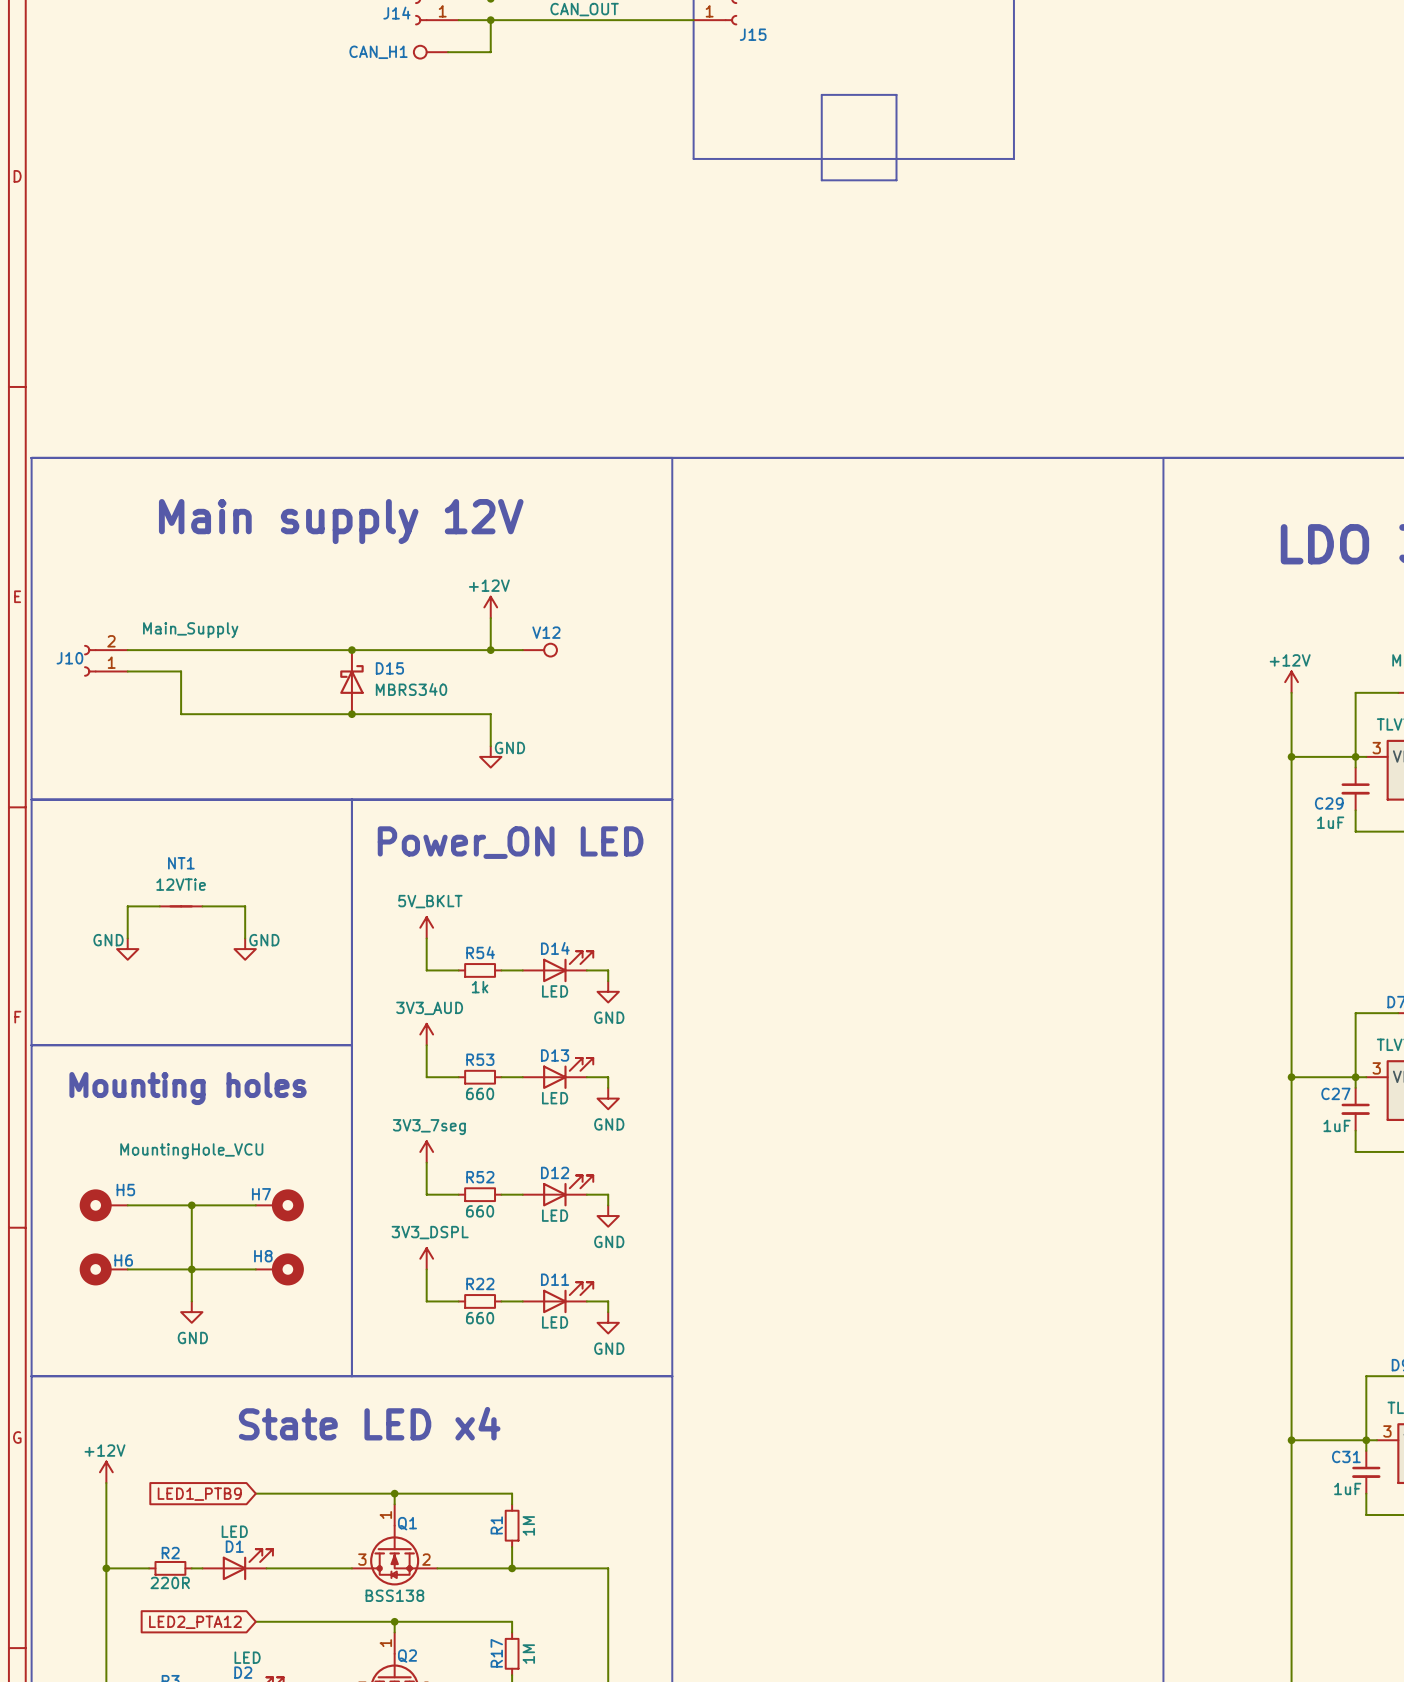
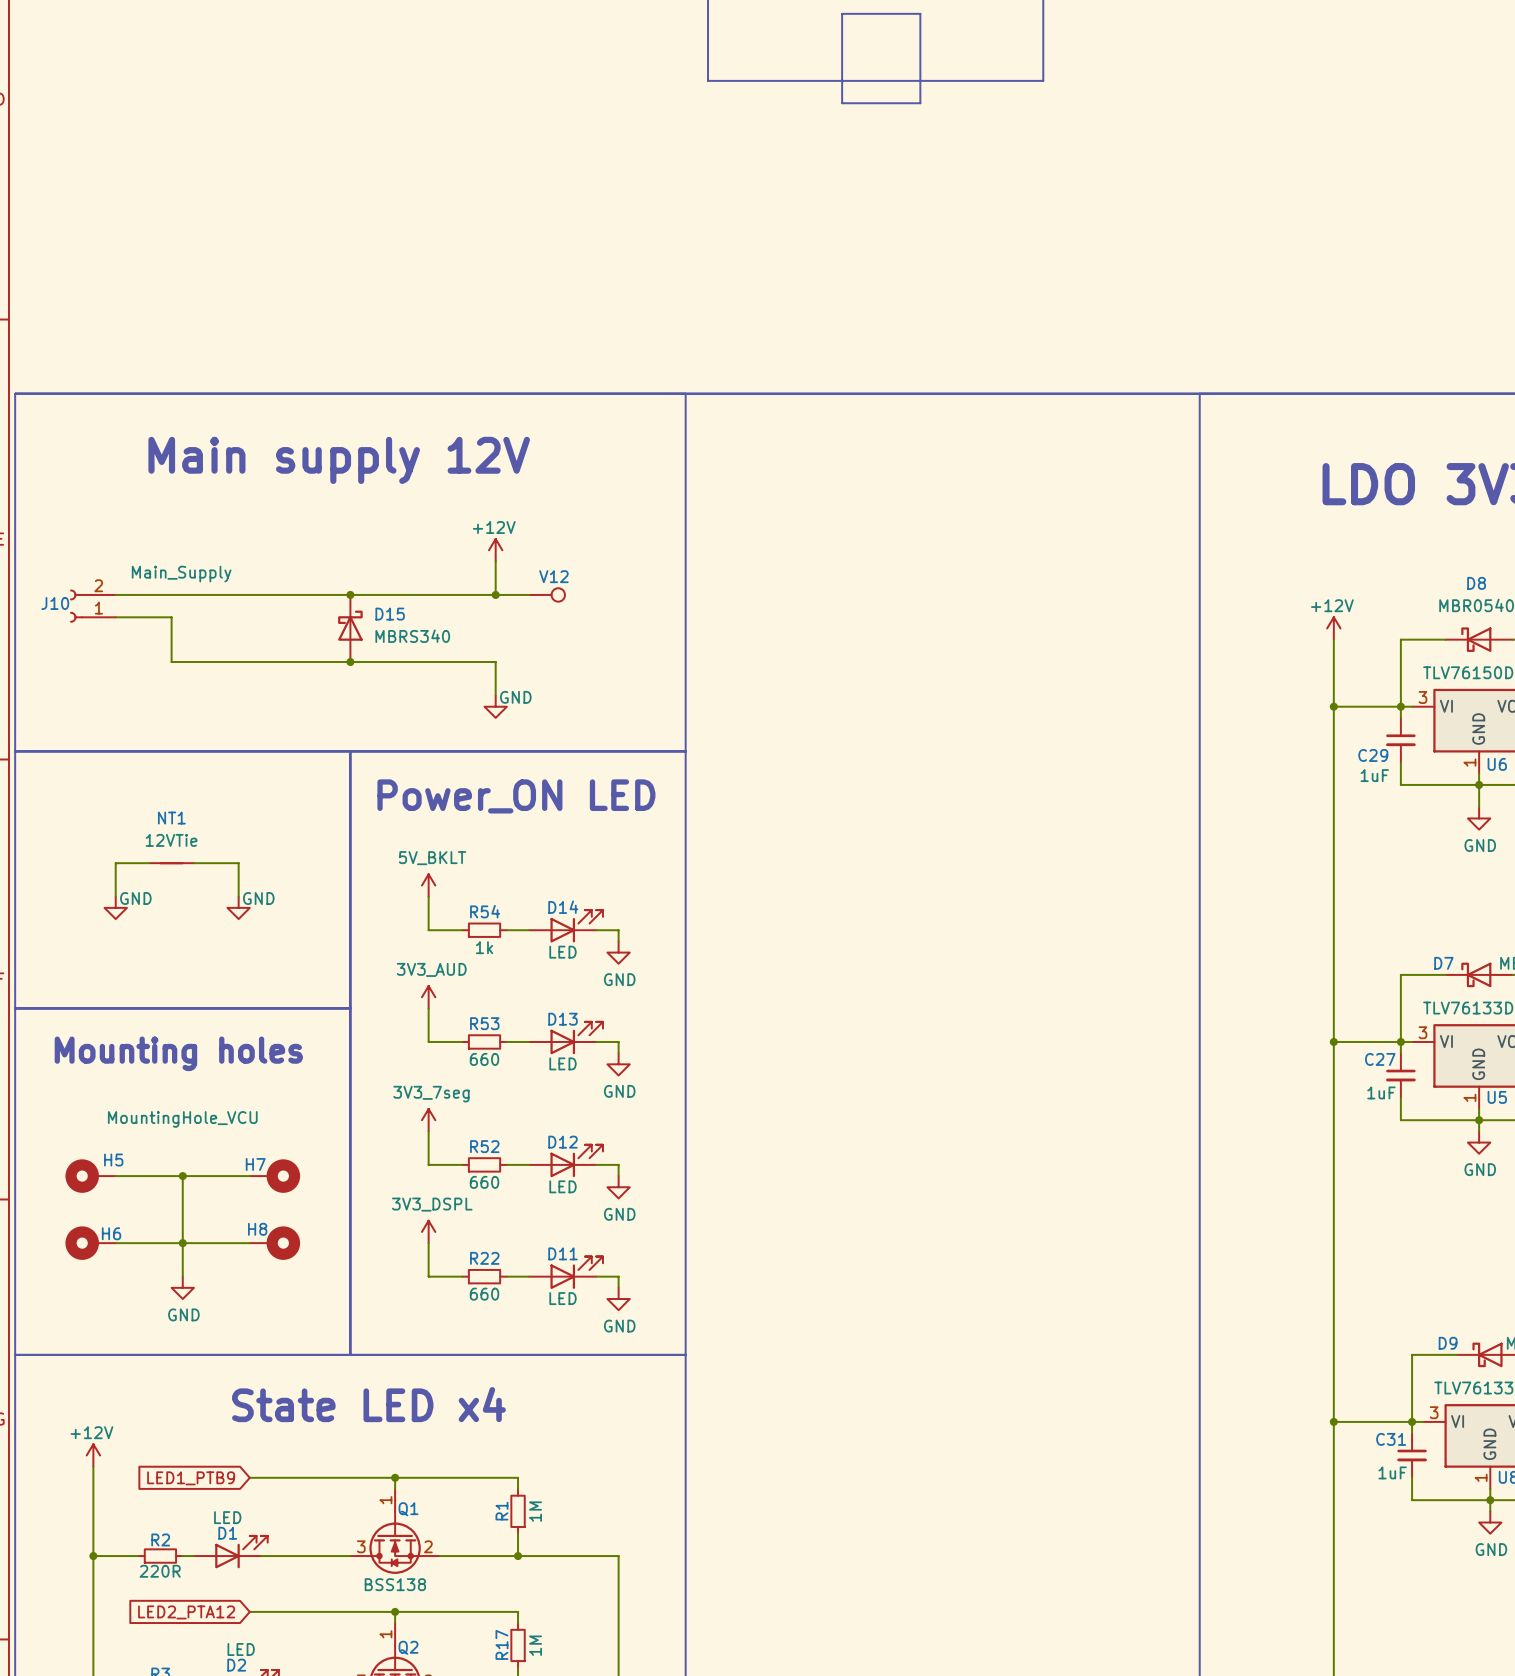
power symbol text position: GND (108, 940) -> GND (135, 898)

